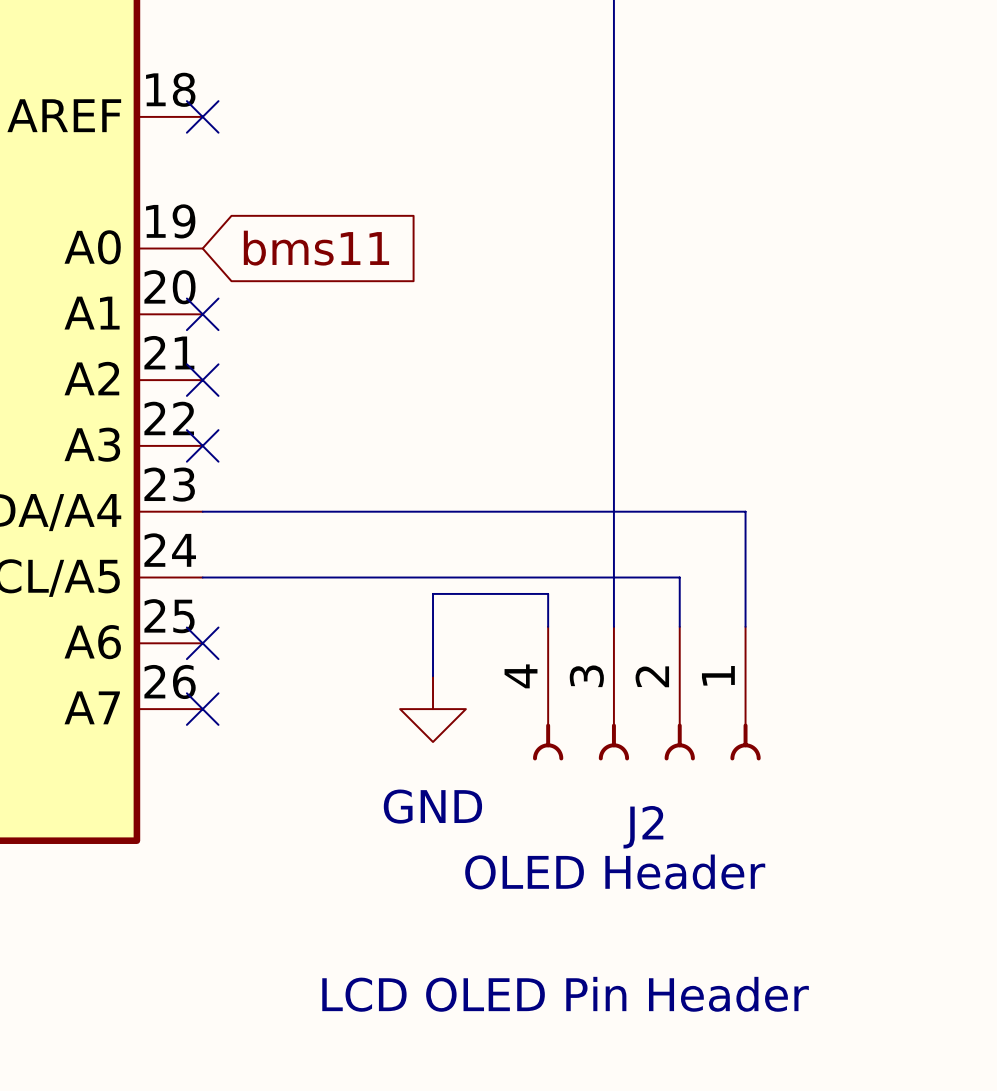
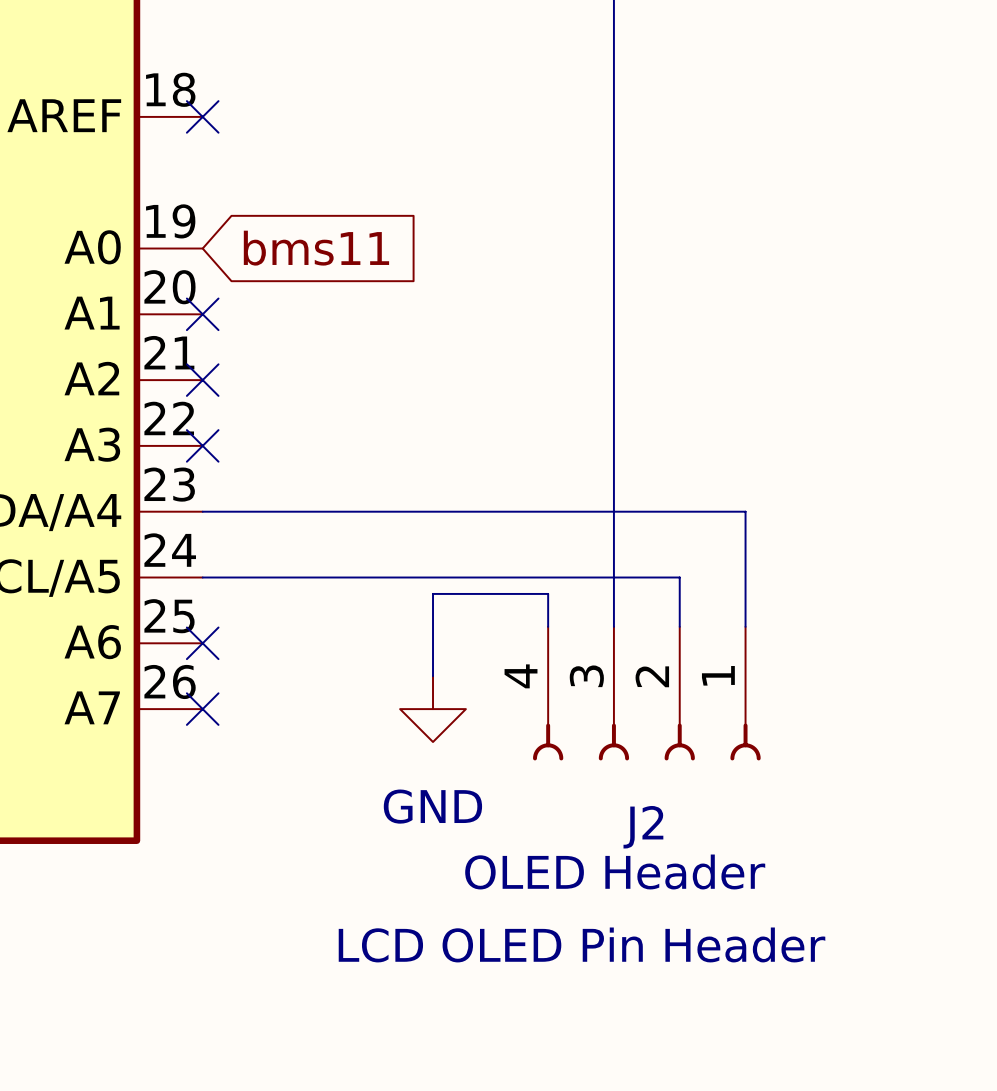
text position: LCD OLED Pin Header (565, 994) -> LCD OLED Pin Header (582, 944)

